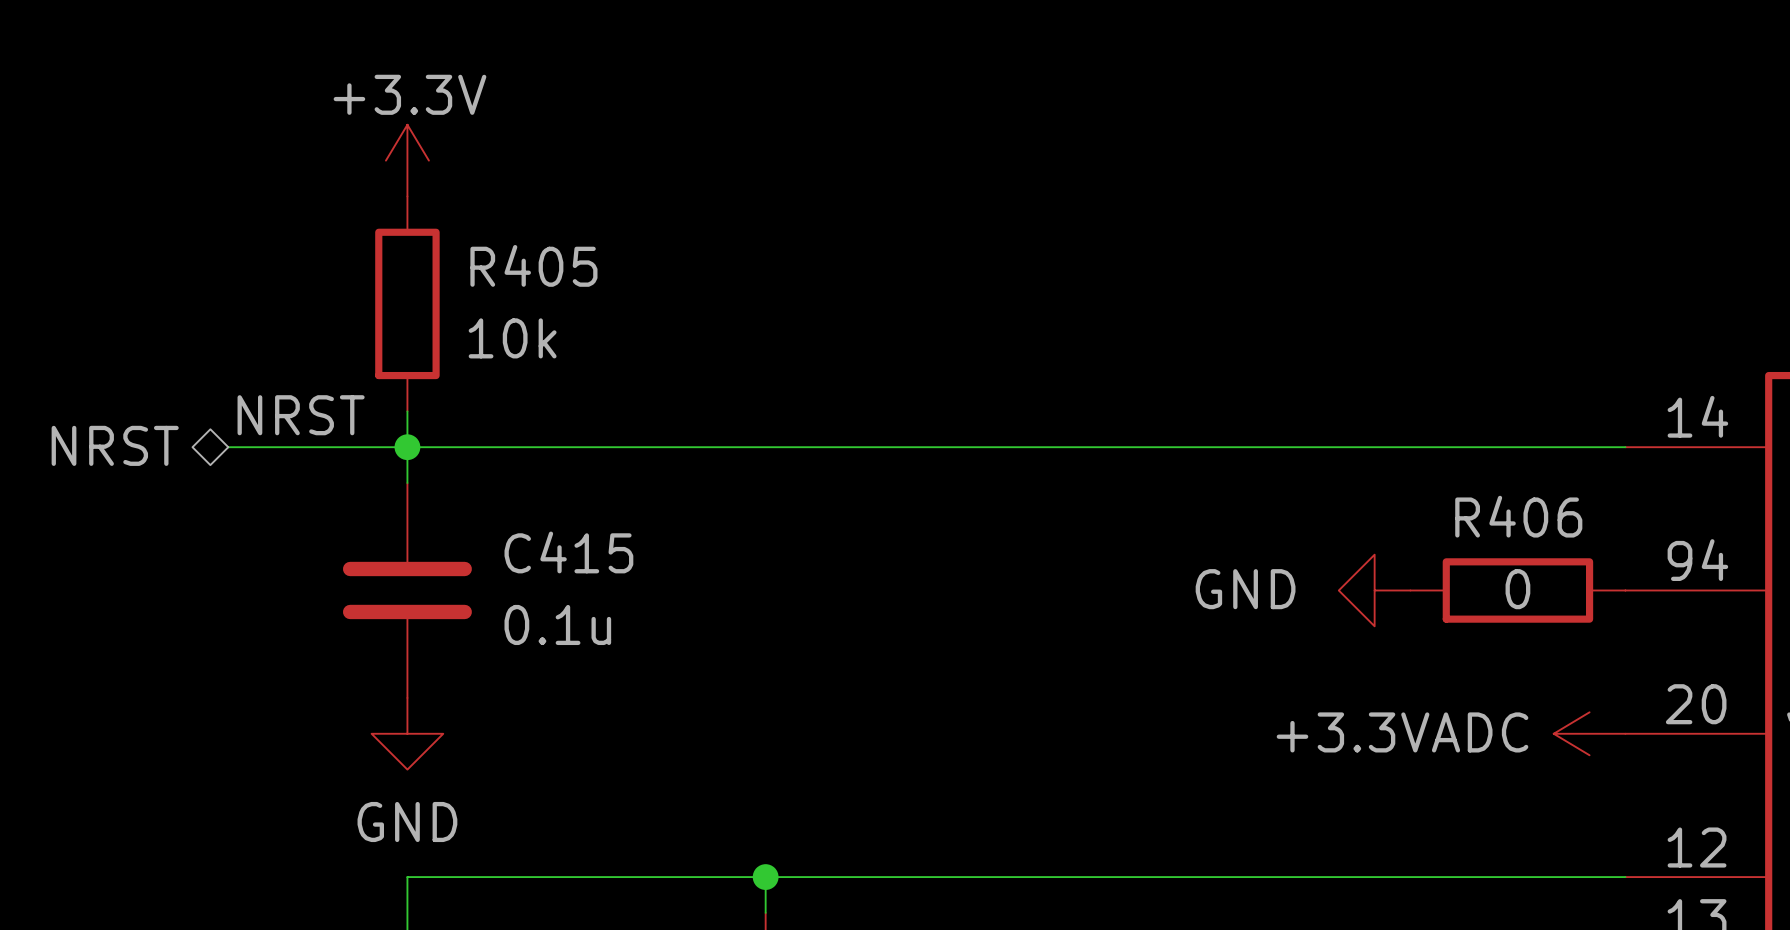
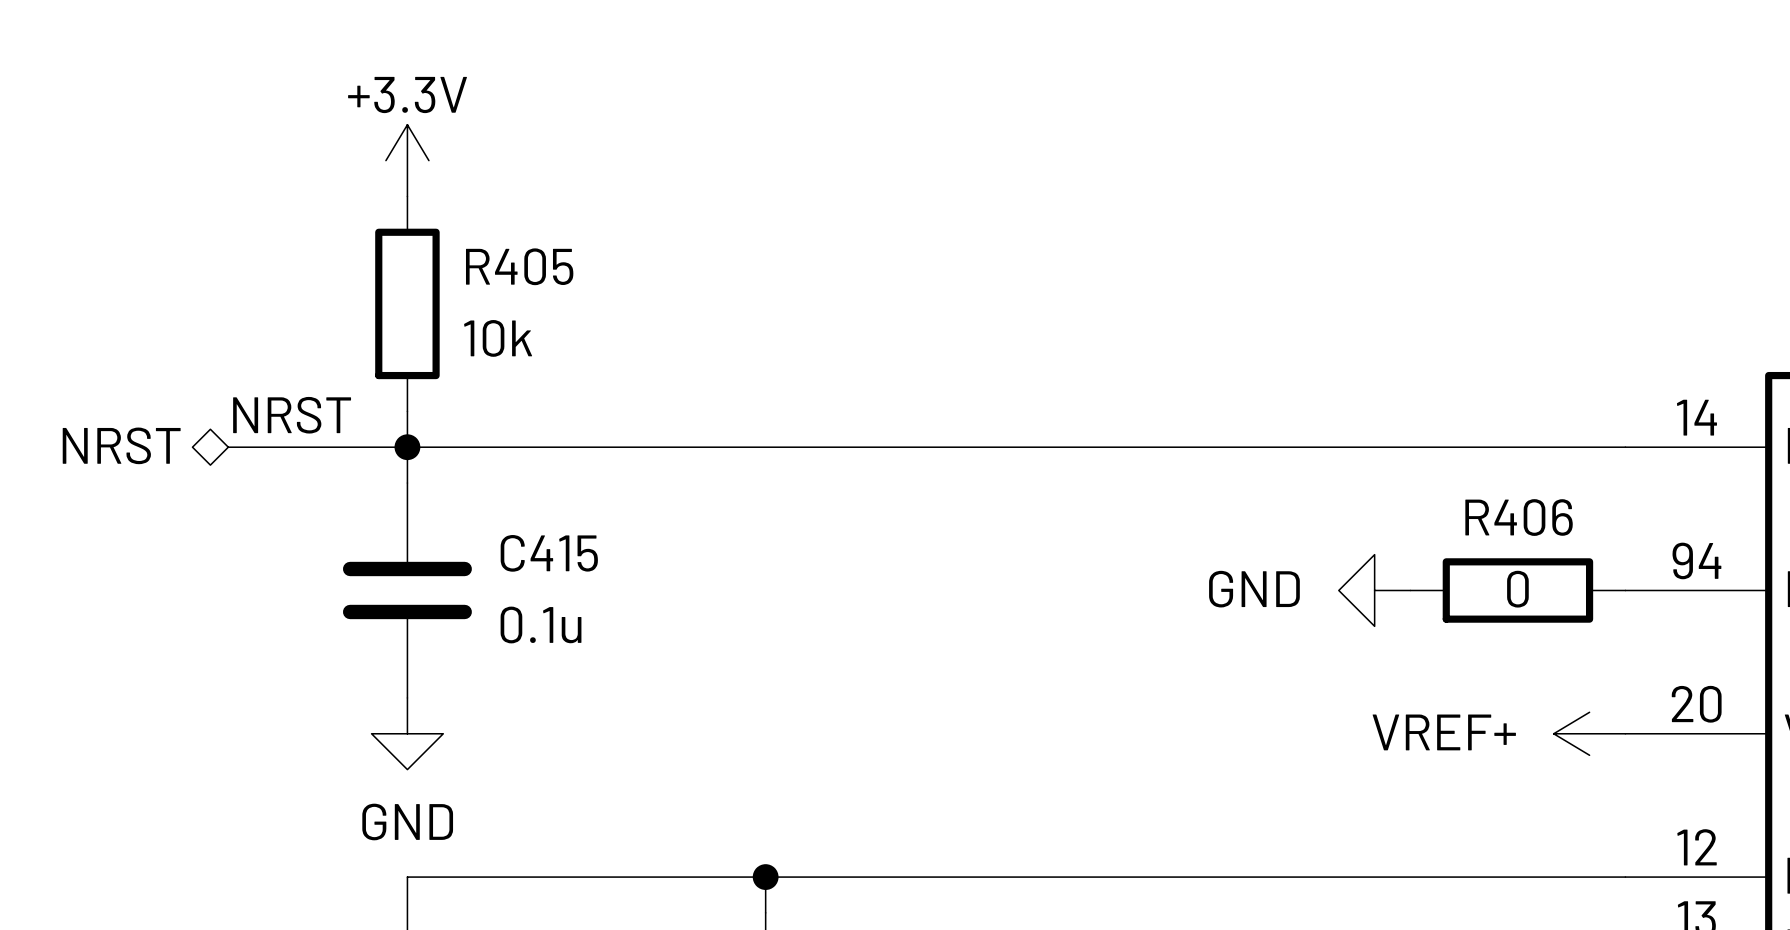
power symbol: +3.3VADC (1589, 733) -> VREF+ (1589, 733)

